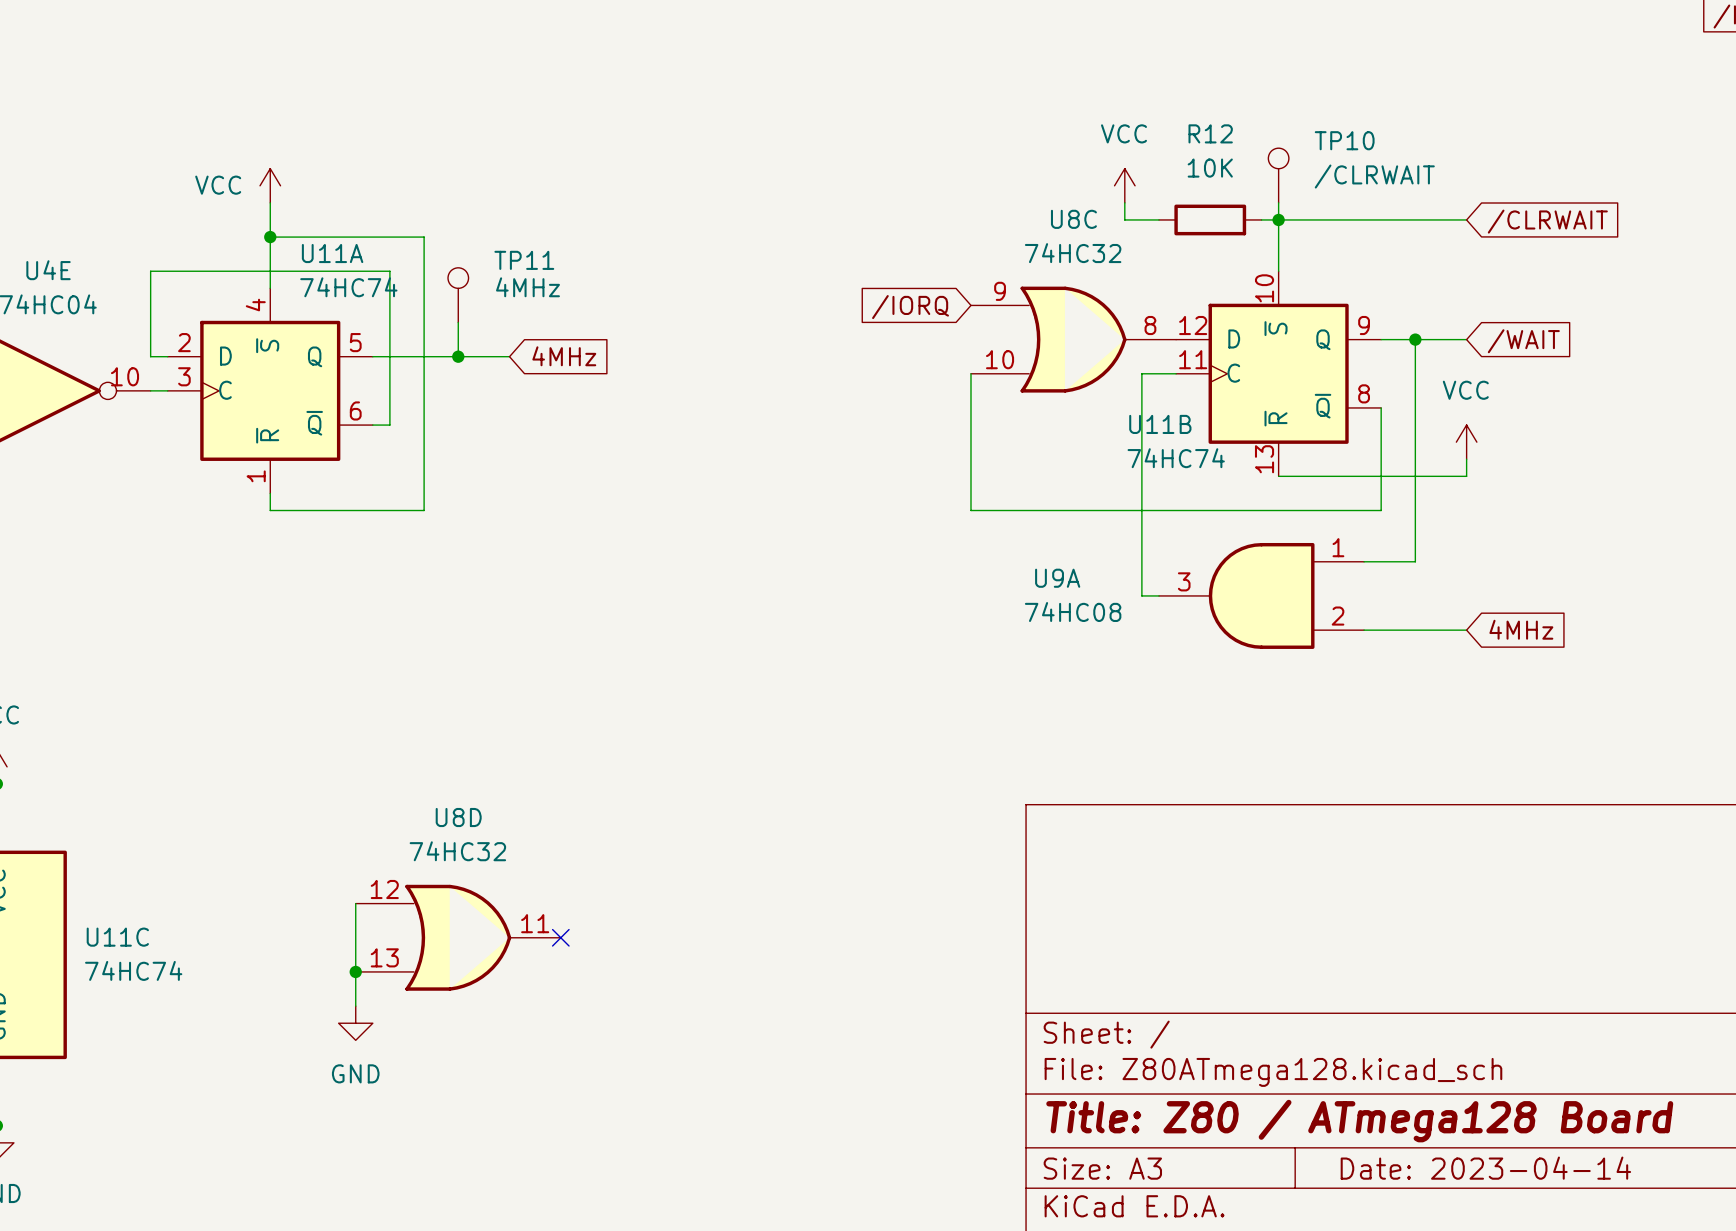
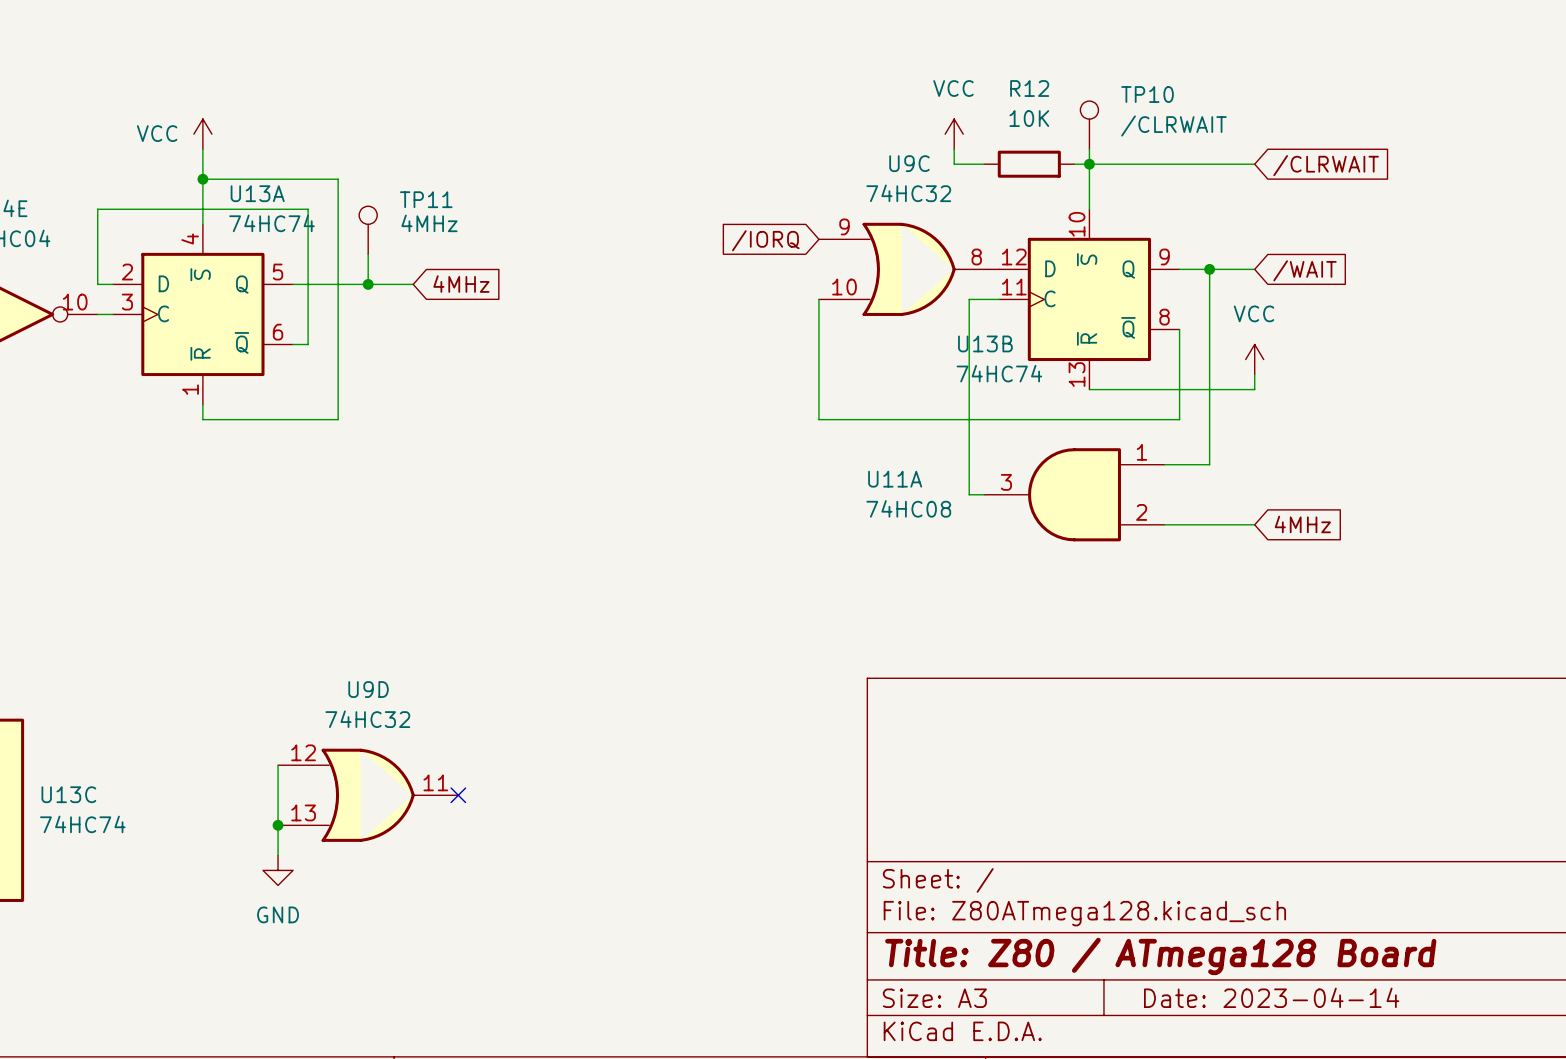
U8C name: U8C (1073, 219) -> U9C (909, 163)
U11A name: U11A (332, 253) -> U13A (257, 193)
U11B name: U11B (1160, 424) -> U13B (985, 343)
U9A name: U9A (1057, 578) -> U11A (895, 479)
U8D name: U8D (458, 817) -> U9D (368, 689)
U11C name: U11C (117, 937) -> U13C (68, 794)

